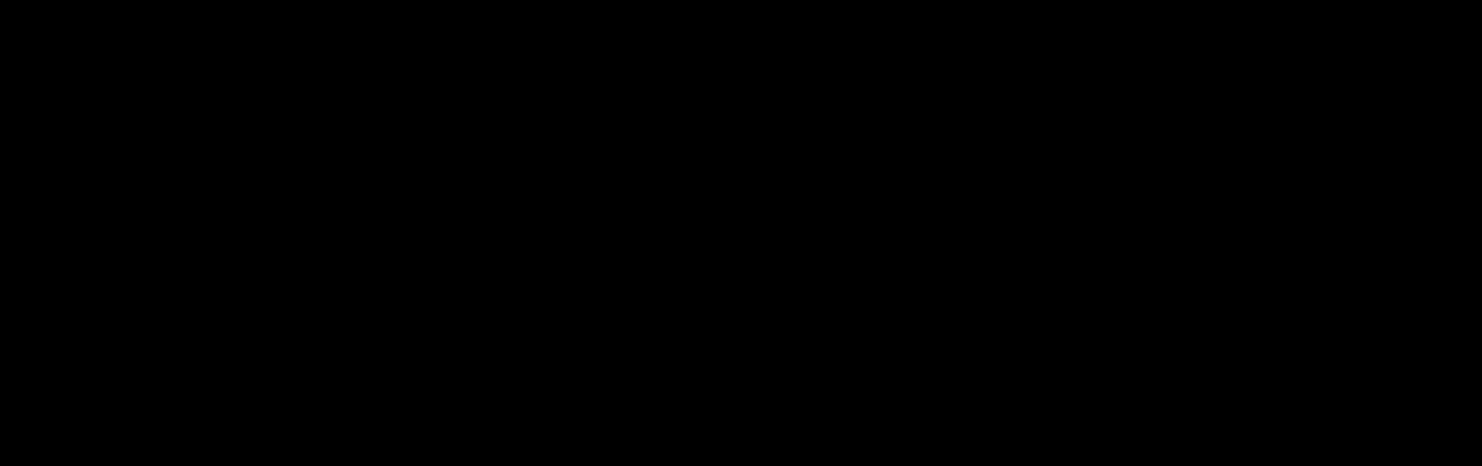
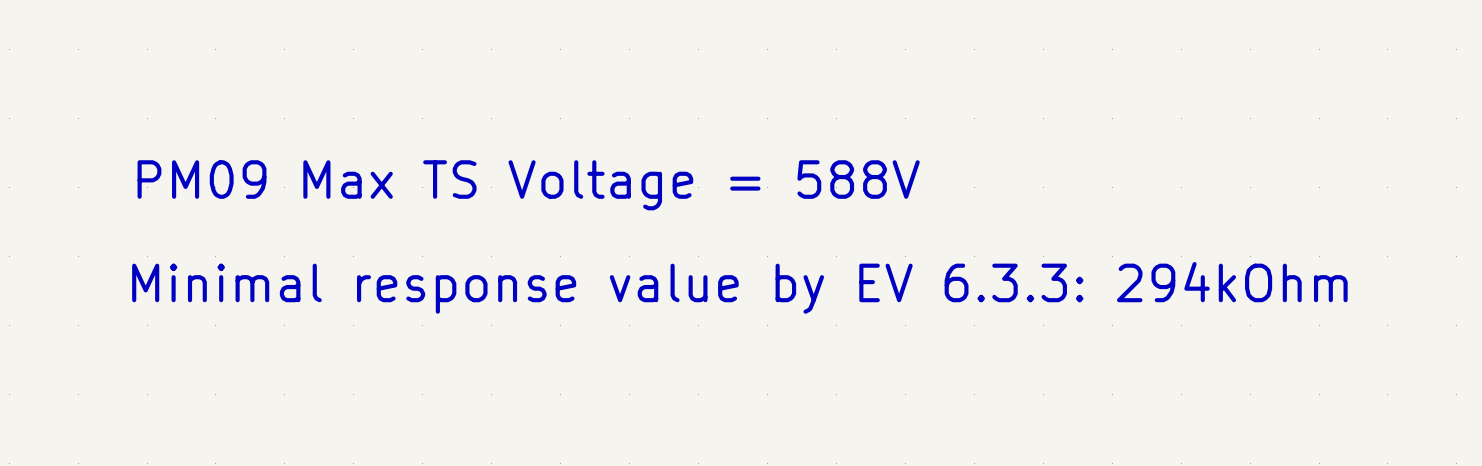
text: none -> PM09 Max TS Voltage = 588V (528, 185)
text: none -> Minimal response value by EV 6.3.3: 294kOhm (739, 287)

